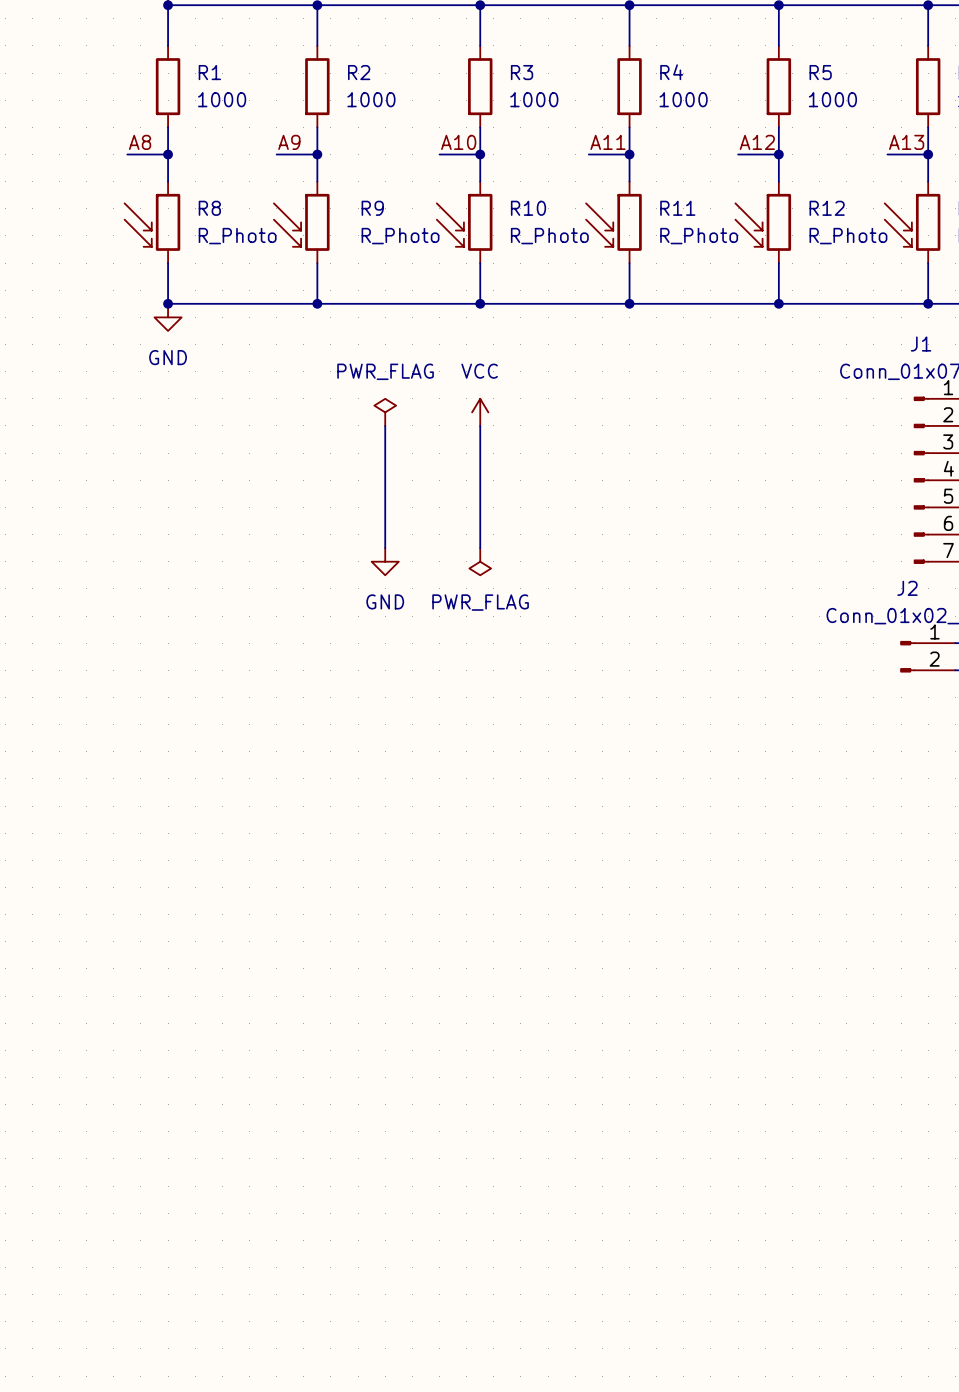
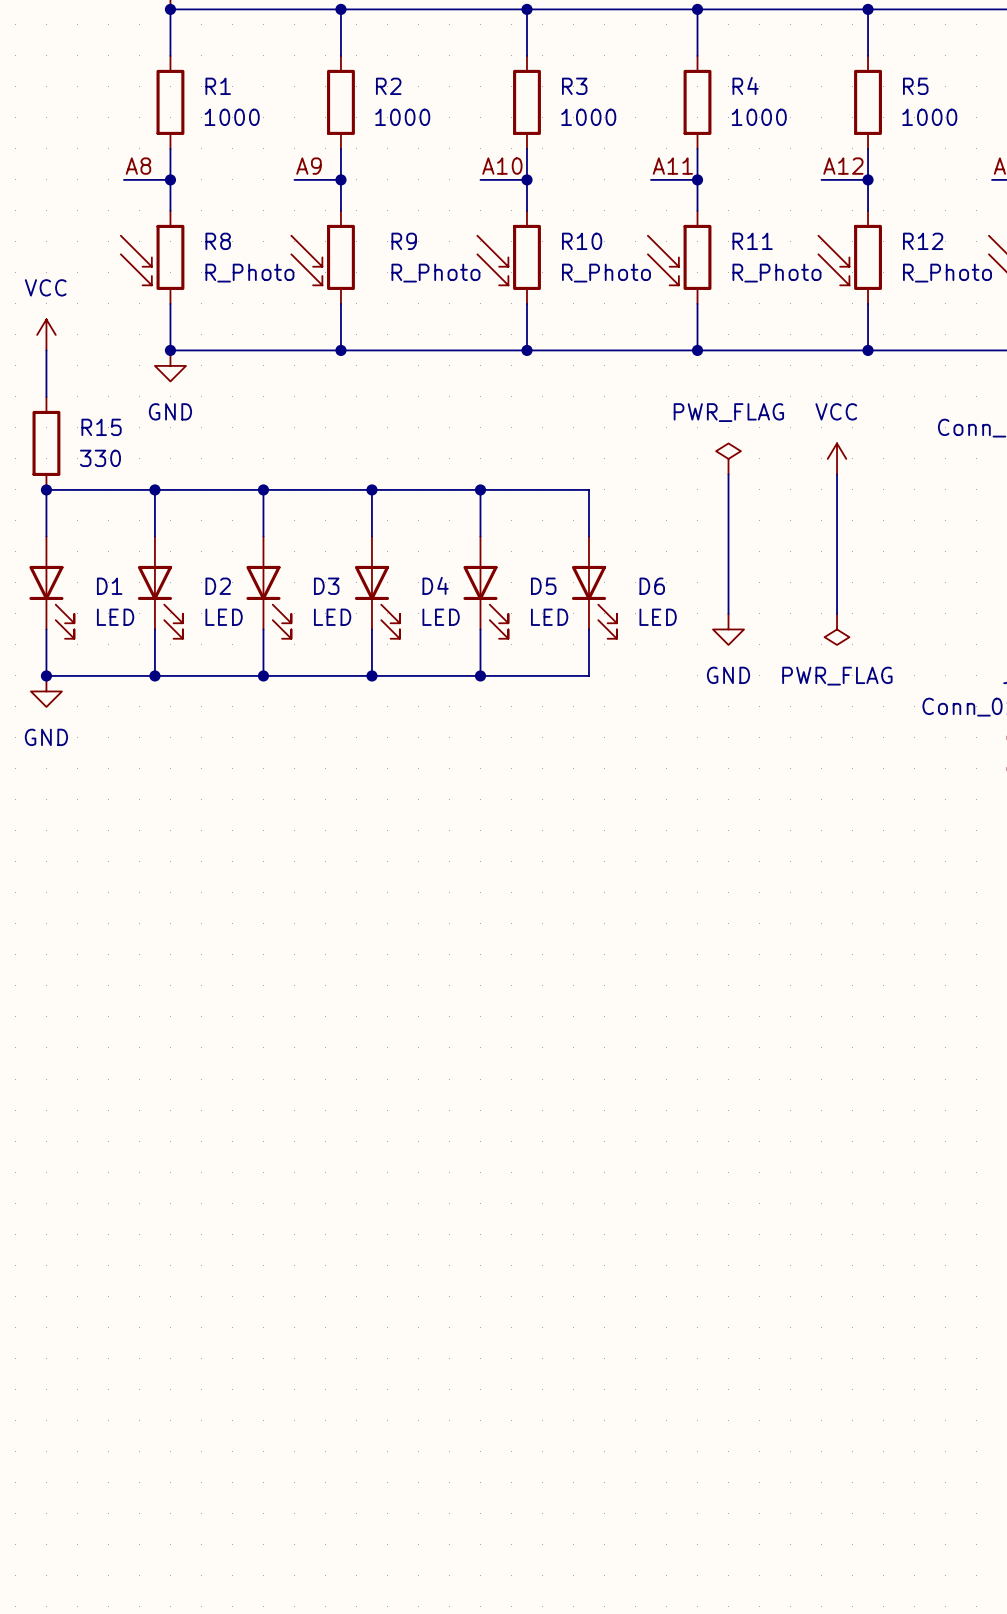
power symbol: none -> VCC (46, 334)
wire: none -> (46, 350) (46, 396)
R15: none -> 330 (46, 443)
power symbol: none -> PWR_FLAG (728, 458)
power symbol: none -> VCC (837, 458)
power symbol: PWR_FLAG (385, 412) -> none
power symbol: VCC (480, 412) -> none
wire: none -> (837, 474) (837, 613)
junction: none -> (46, 489)
wire: none -> (154, 489) (154, 536)
junction: none -> (154, 489)
wire: none -> (263, 489) (263, 536)
junction: none -> (263, 489)
wire: none -> (371, 489) (371, 536)
junction: none -> (371, 489)
wire: (385, 425) (385, 548) -> none
wire: none -> (480, 489) (480, 536)
junction: none -> (480, 489)
wire: (480, 425) (480, 548) -> (728, 474) (728, 613)
wire: none -> (46, 536) (46, 489) (588, 489) (588, 536)
D1: none -> LED (51, 587)
D2: none -> LED (160, 587)
D3: none -> LED (268, 587)
D4: none -> LED (377, 587)
D5: none -> LED (485, 587)
D6: none -> LED (594, 587)
wire: none -> (46, 629) (46, 675) (588, 675) (588, 629)
wire: none -> (154, 629) (154, 675)
wire: none -> (263, 629) (263, 675)
wire: none -> (371, 629) (371, 675)
wire: none -> (480, 629) (480, 675)
power symbol: none -> GND (728, 629)
power symbol: none -> PWR_FLAG (837, 629)
power symbol: GND (385, 561) -> none
power symbol: PWR_FLAG (480, 561) -> none
junction: none -> (46, 675)
junction: none -> (154, 675)
junction: none -> (263, 675)
junction: none -> (371, 675)
junction: none -> (480, 675)
power symbol: none -> GND (46, 691)

